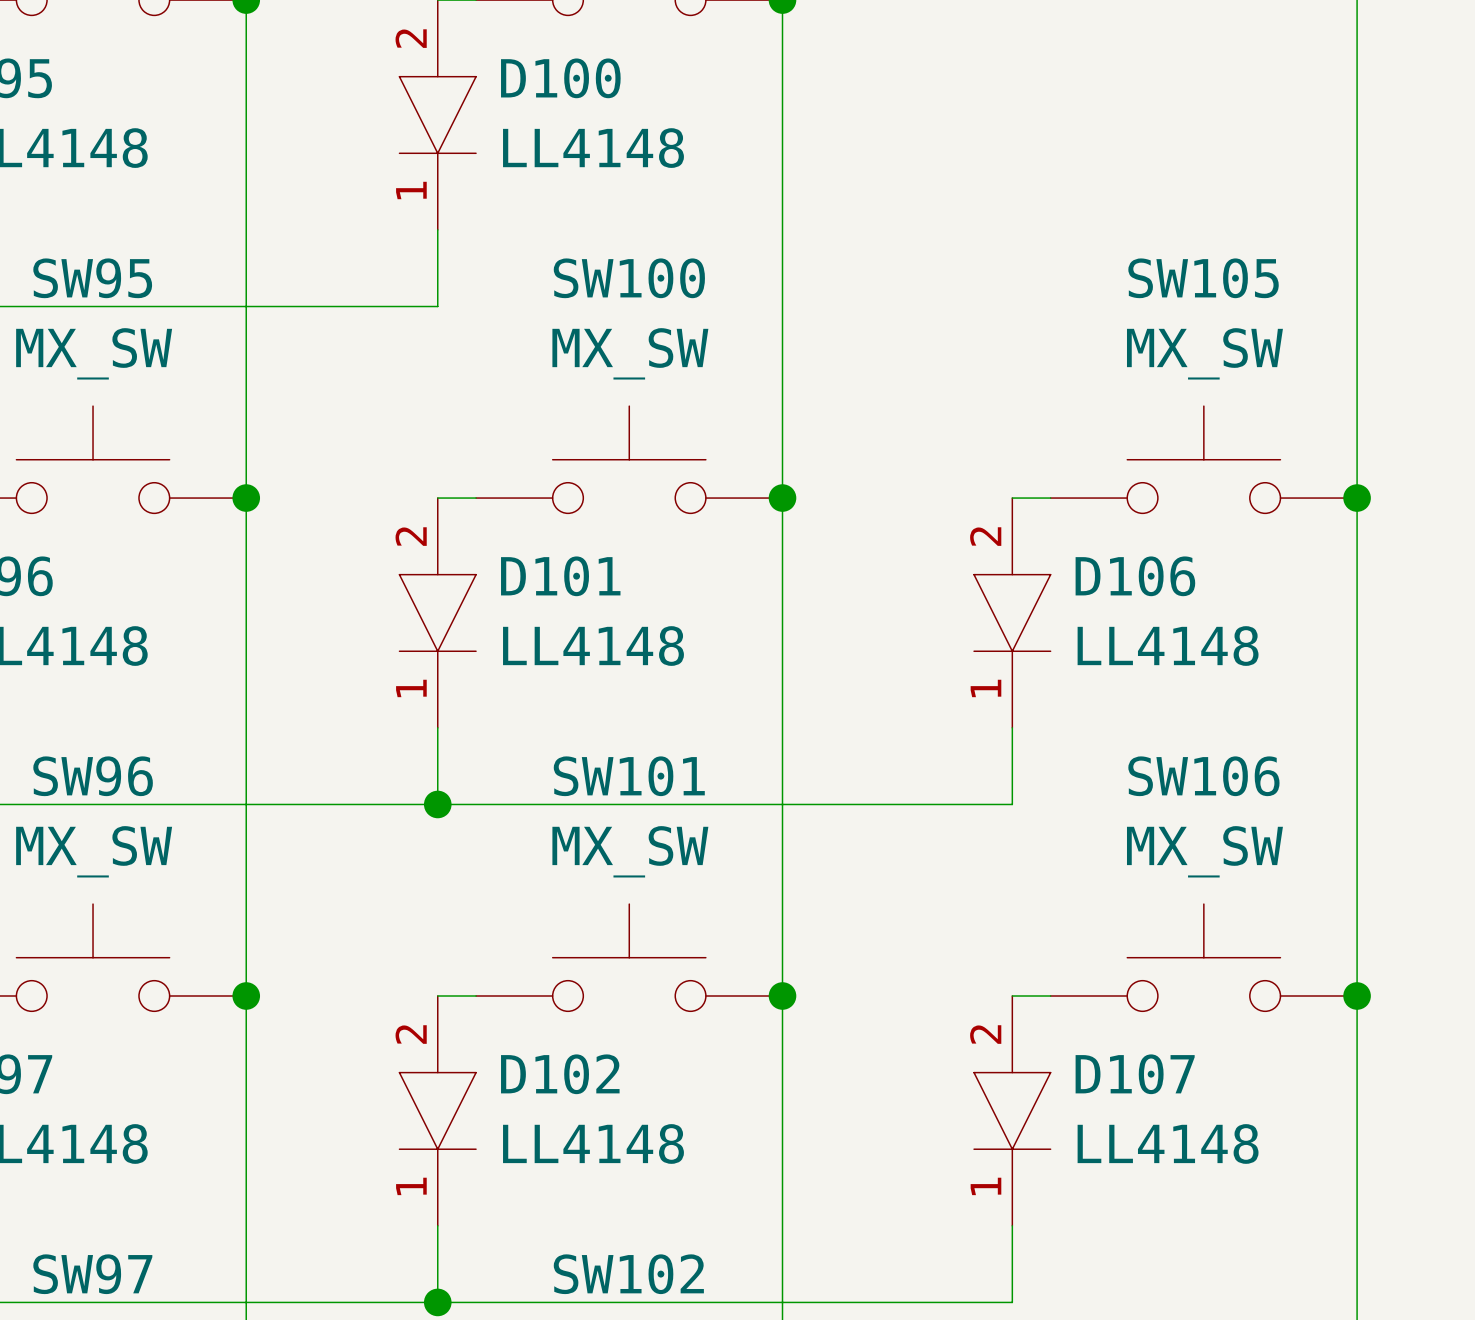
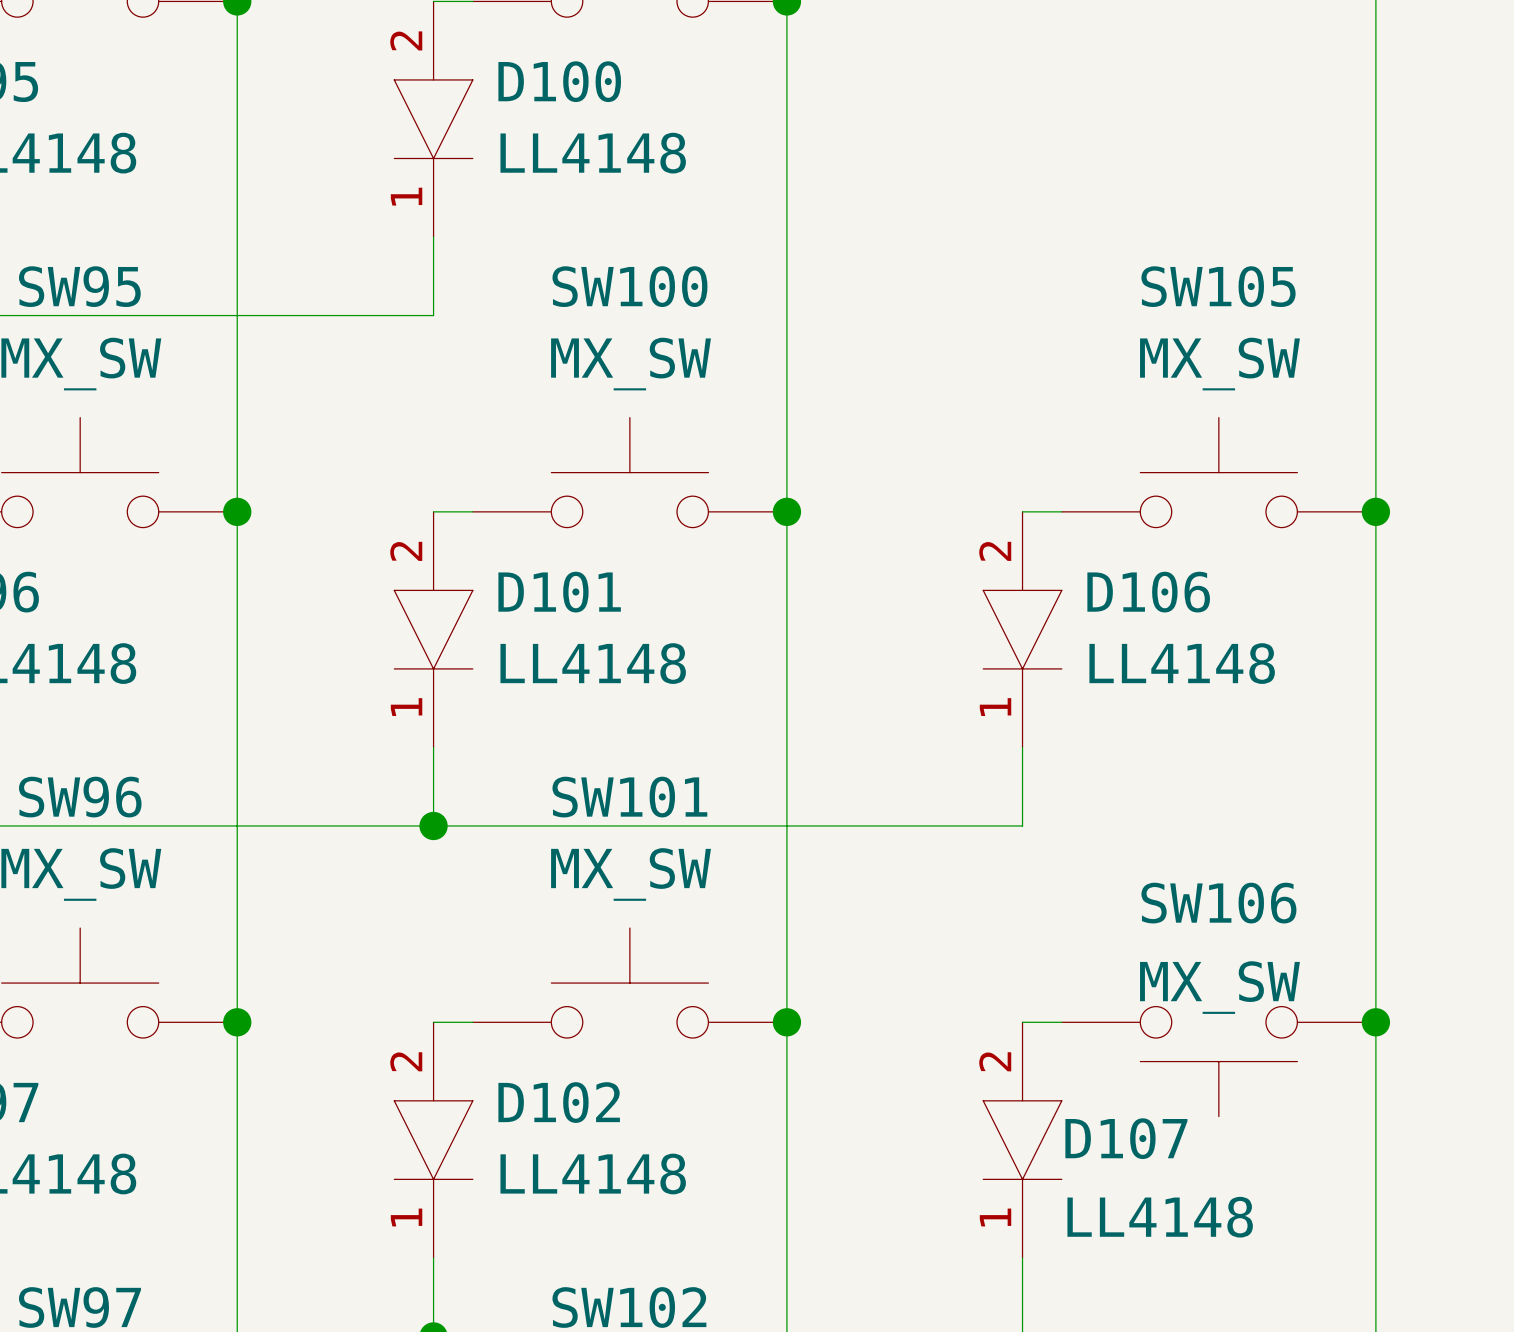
SW106 rotation: 0° (1203, 957) -> 180° (1218, 1061)
D107 name position: D107 (1135, 1074) -> D107 (1126, 1138)
D107 value position: LL4148 (1168, 1143) -> LL4148 (1160, 1217)

